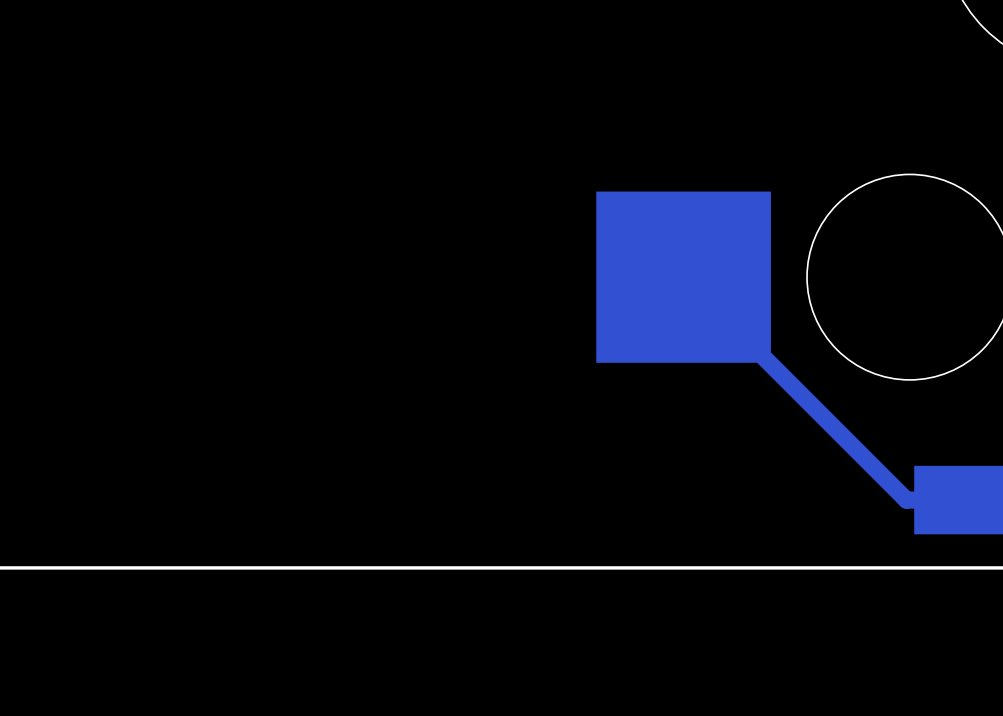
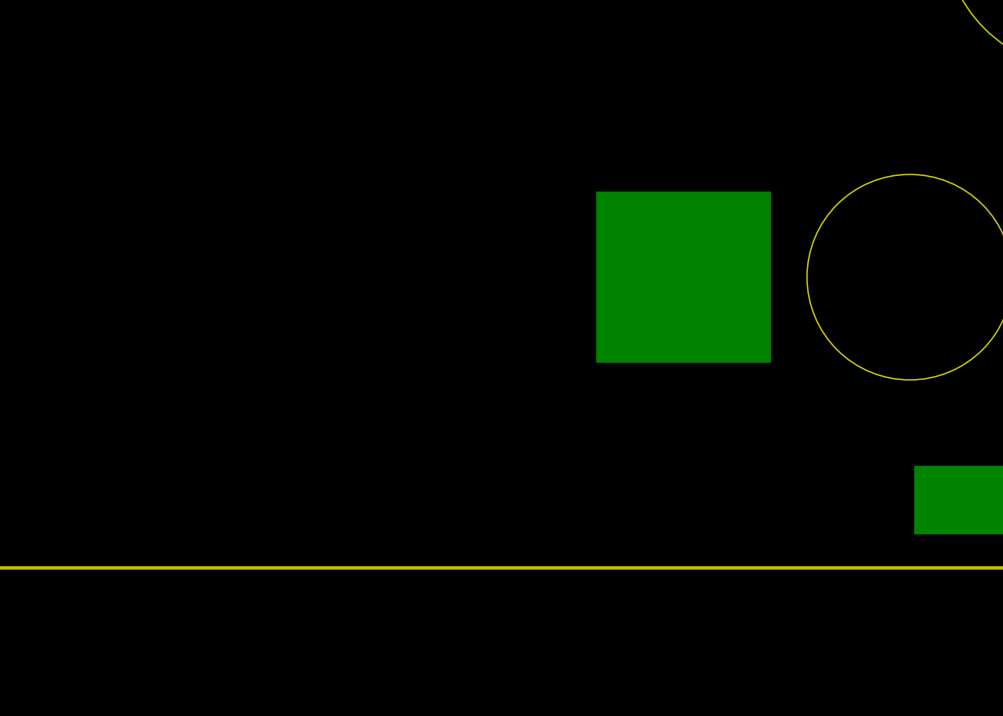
bottom track: (683, 277) (906, 500) (962, 500) -> none

